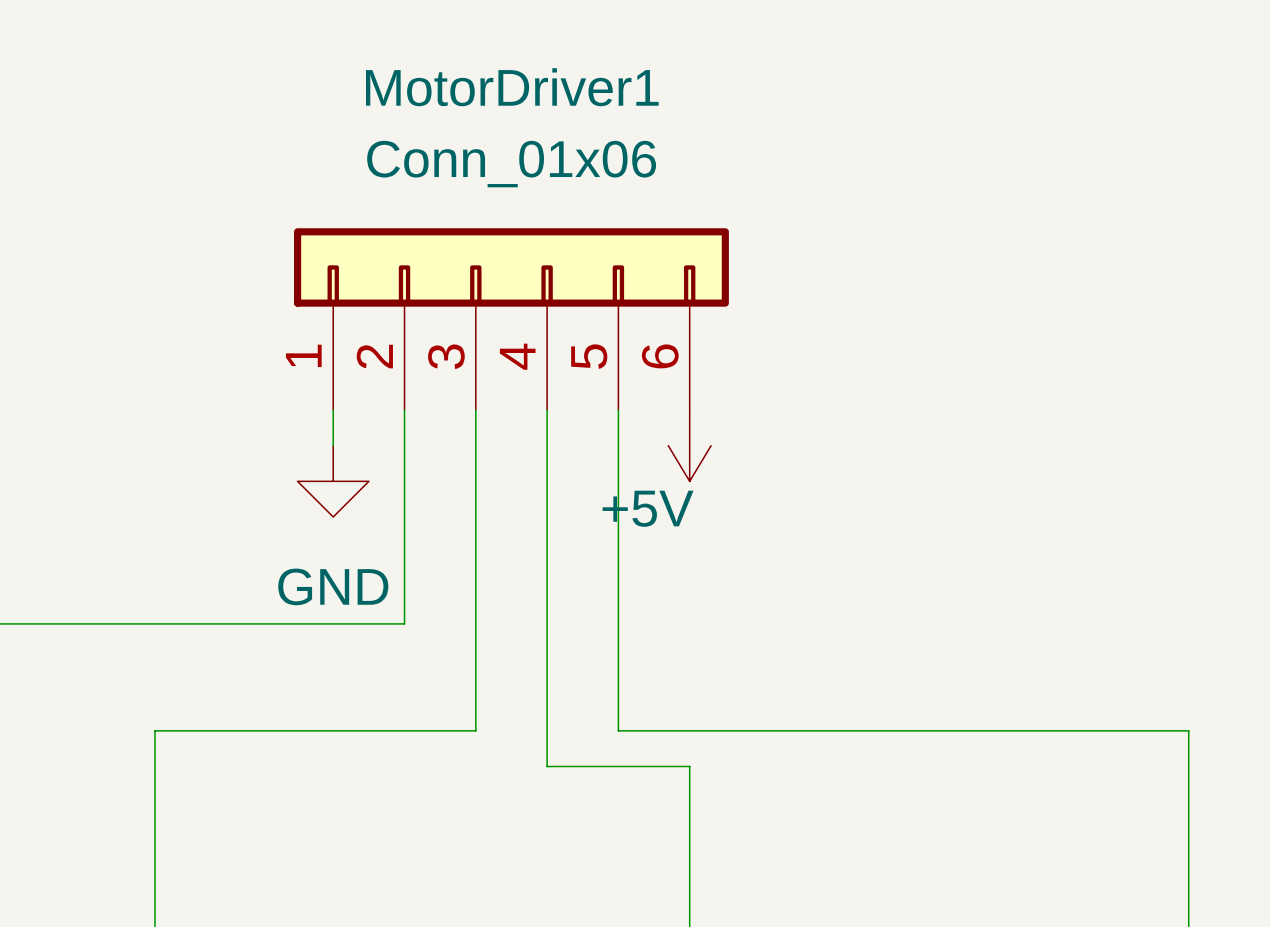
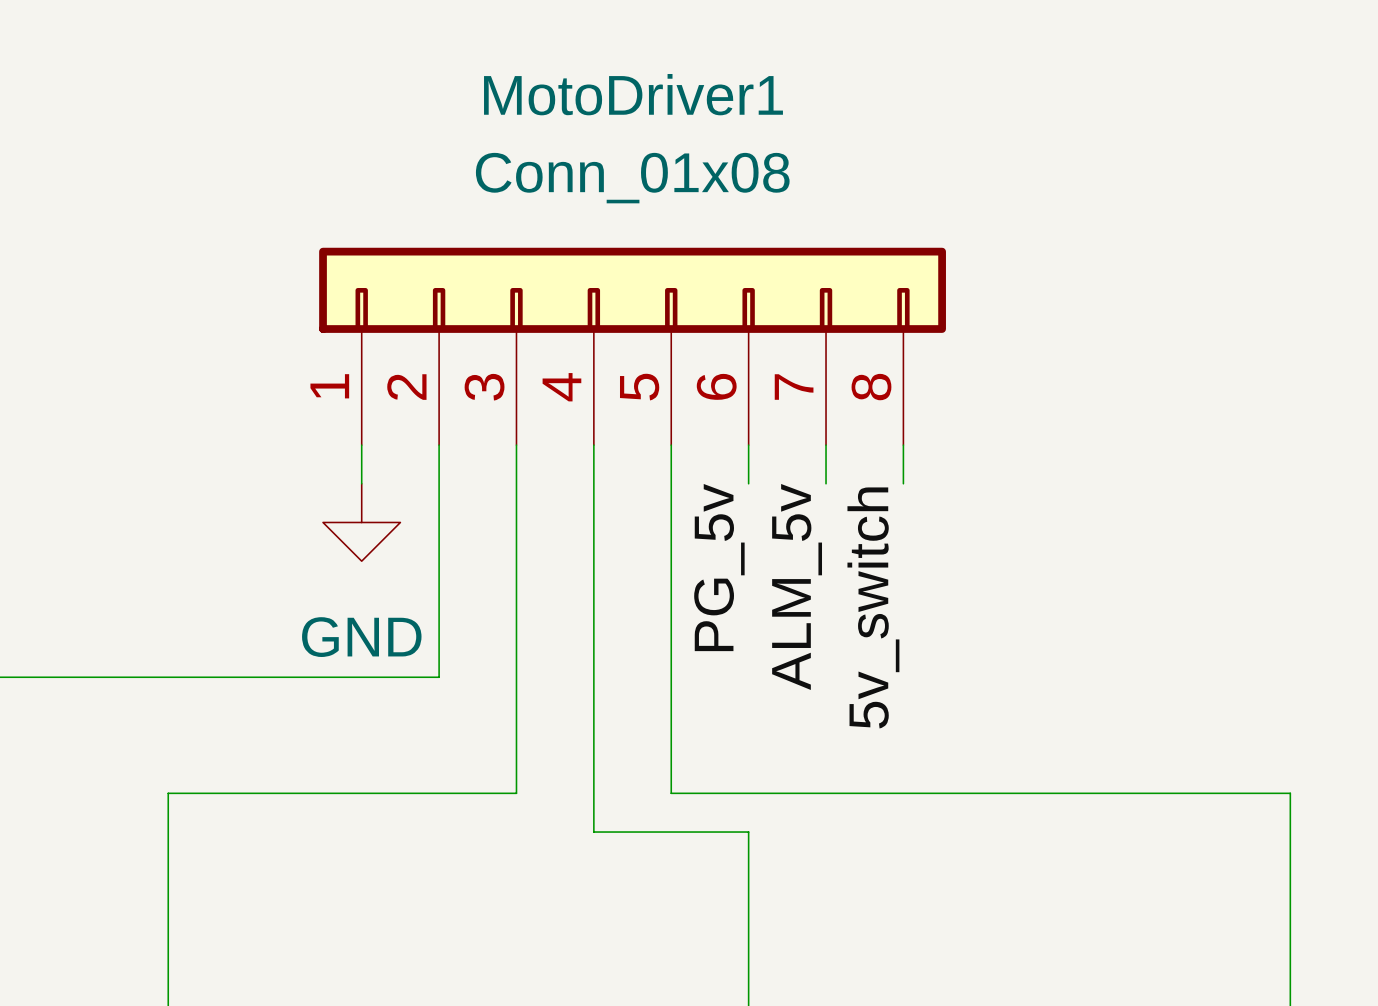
MotorDriver1: Conn_01x06 (511, 319) -> none
MotoDriver1: none -> Conn_01x08 (632, 346)
wire: none -> (826, 445) (826, 483)
wire: none -> (903, 445) (903, 483)
power symbol: +5V (689, 445) -> none
label: none -> PG_5v (719, 567)
label: none -> ALM_5v (797, 586)
label: none -> 5v_switch (873, 607)

